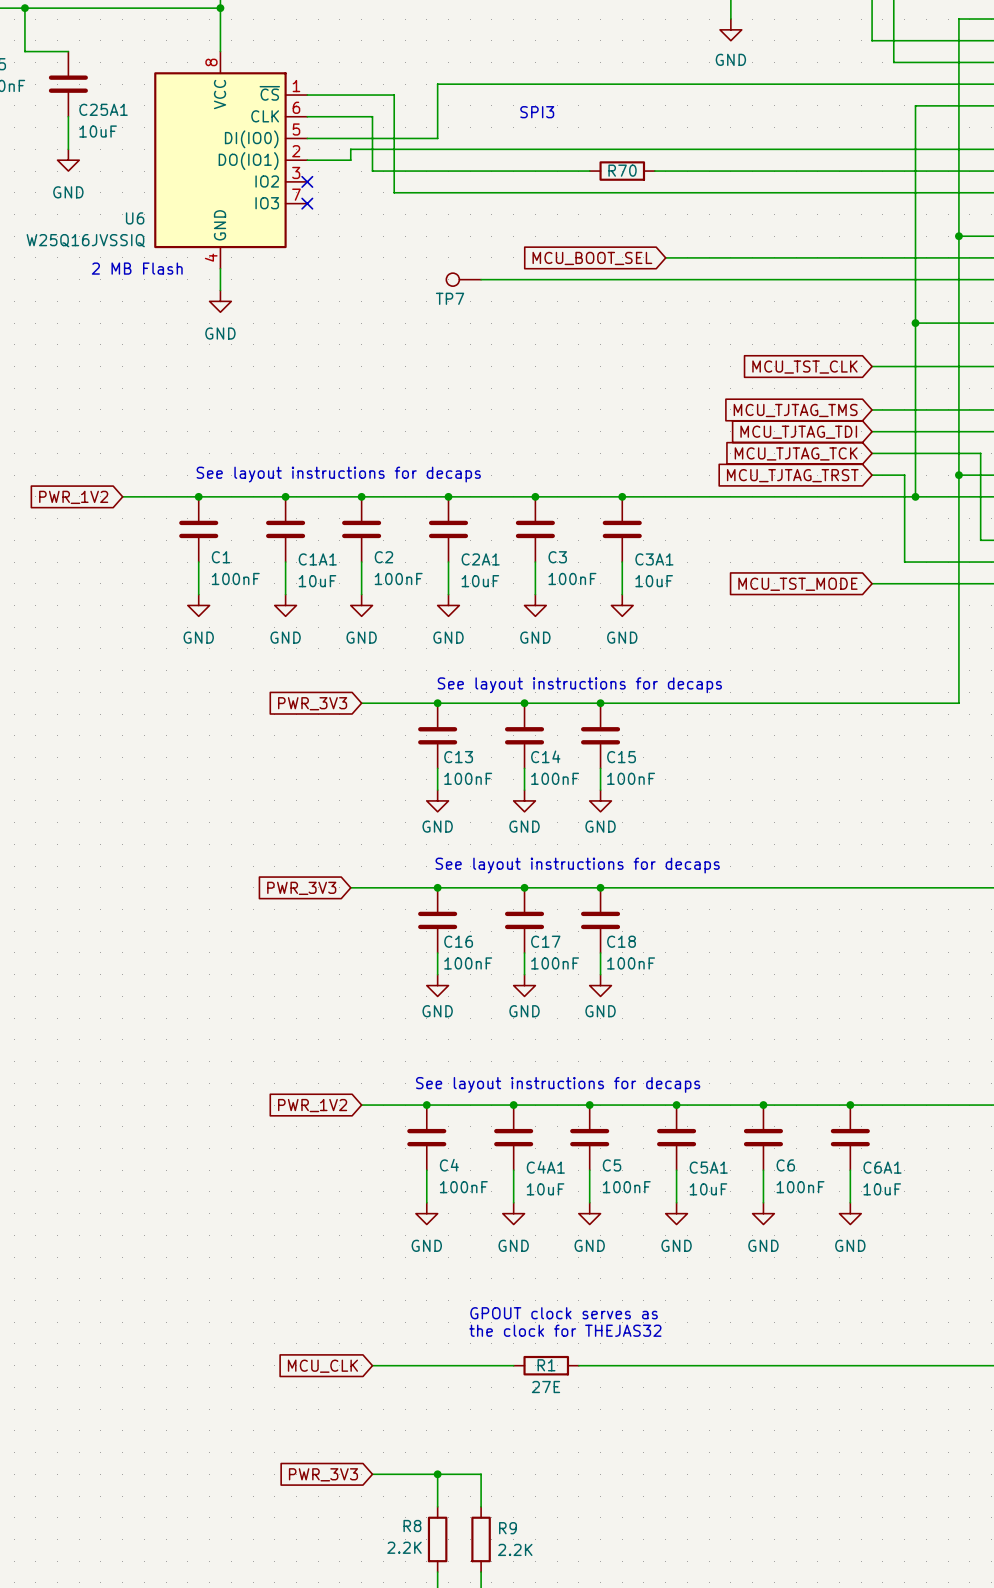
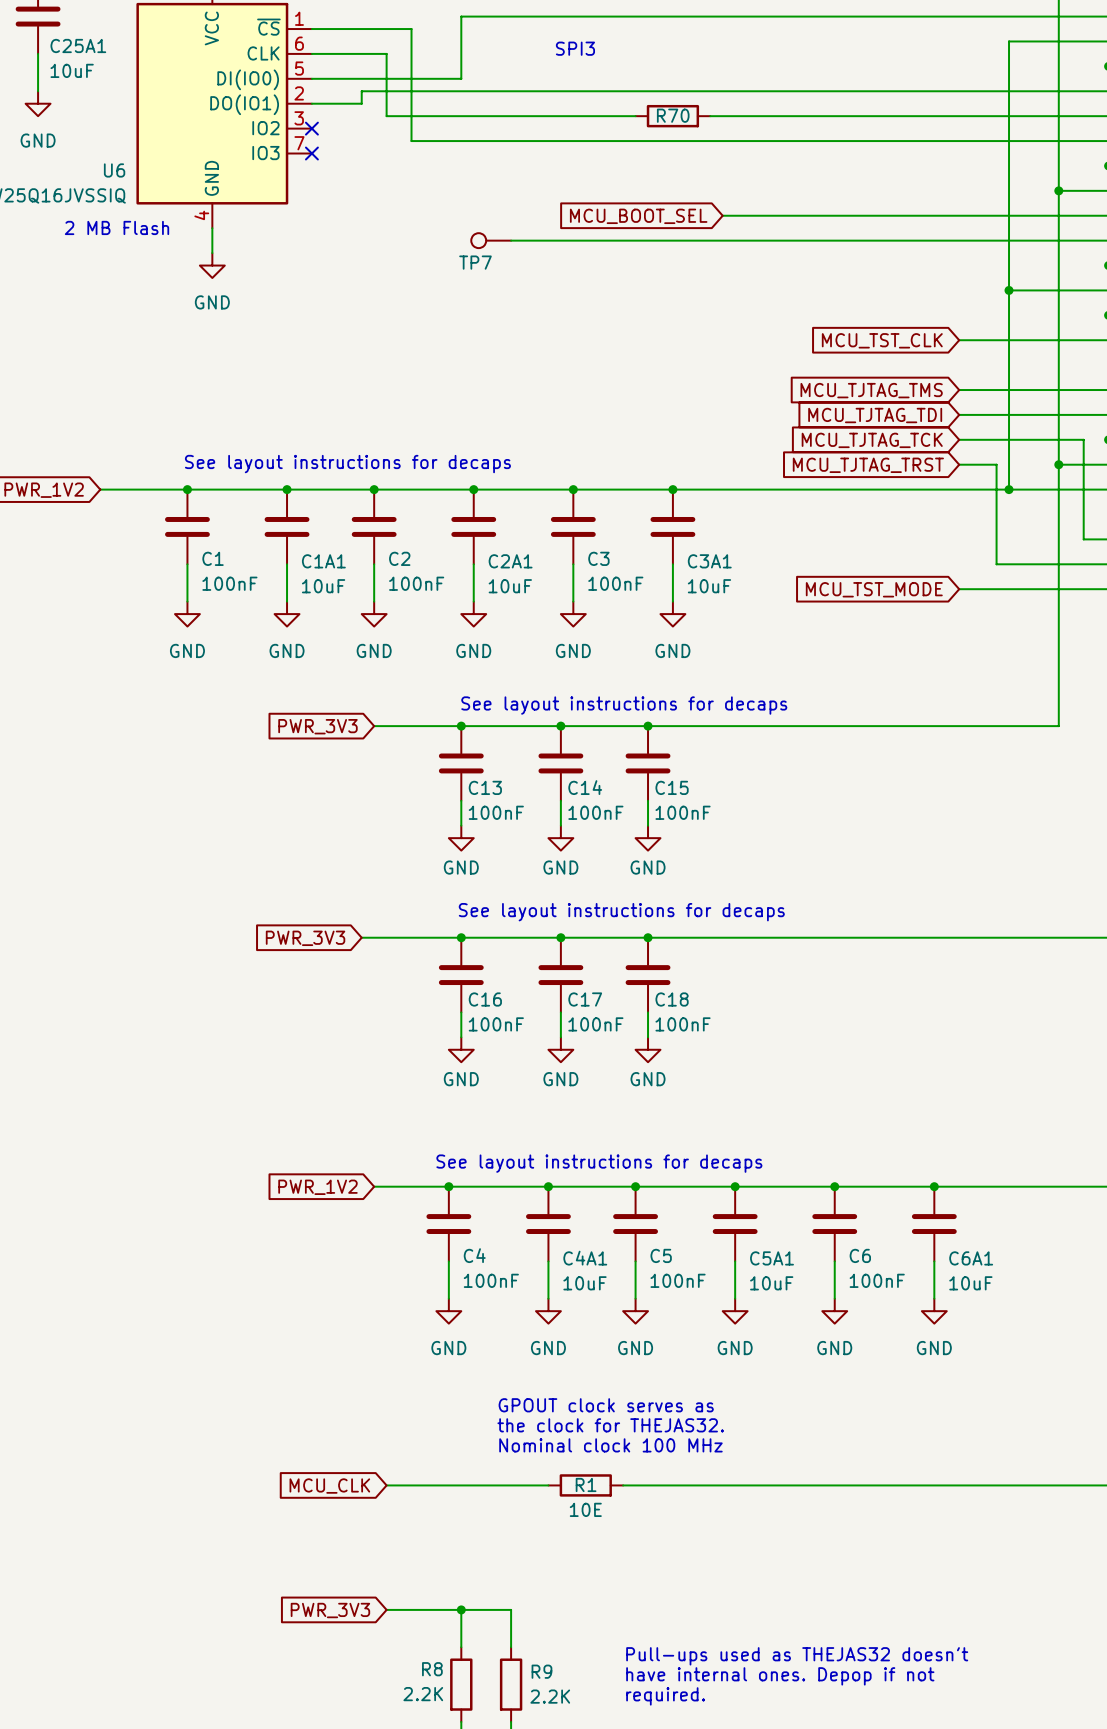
text: none -> GPOUT clock serves as (606, 1405)
text: GPOUT clock serves as (564, 1313) -> the clock for THEJAS32. (610, 1425)
text: the clock for THEJAS32 (565, 1330) -> Nominal clock 100 MHz (610, 1445)
R1 value: 27E (545, 1387) -> 10E (585, 1509)
text: none -> Pull-ups used as THEJAS32 doesn't (797, 1656)
text: none -> have internal ones. Depop if not (780, 1676)
text: none -> required. (665, 1696)

